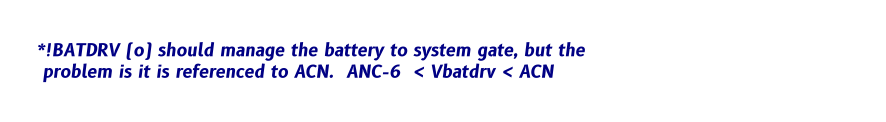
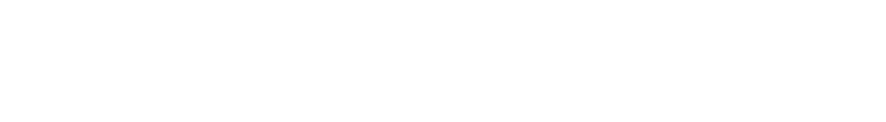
text: *!BATDRV (o) should manage the battery to system gate, but the (311, 51) -> none
text: problem is it is referenced to ACN. ANC-6 < Vbatdrv < ACN (298, 72) -> none

